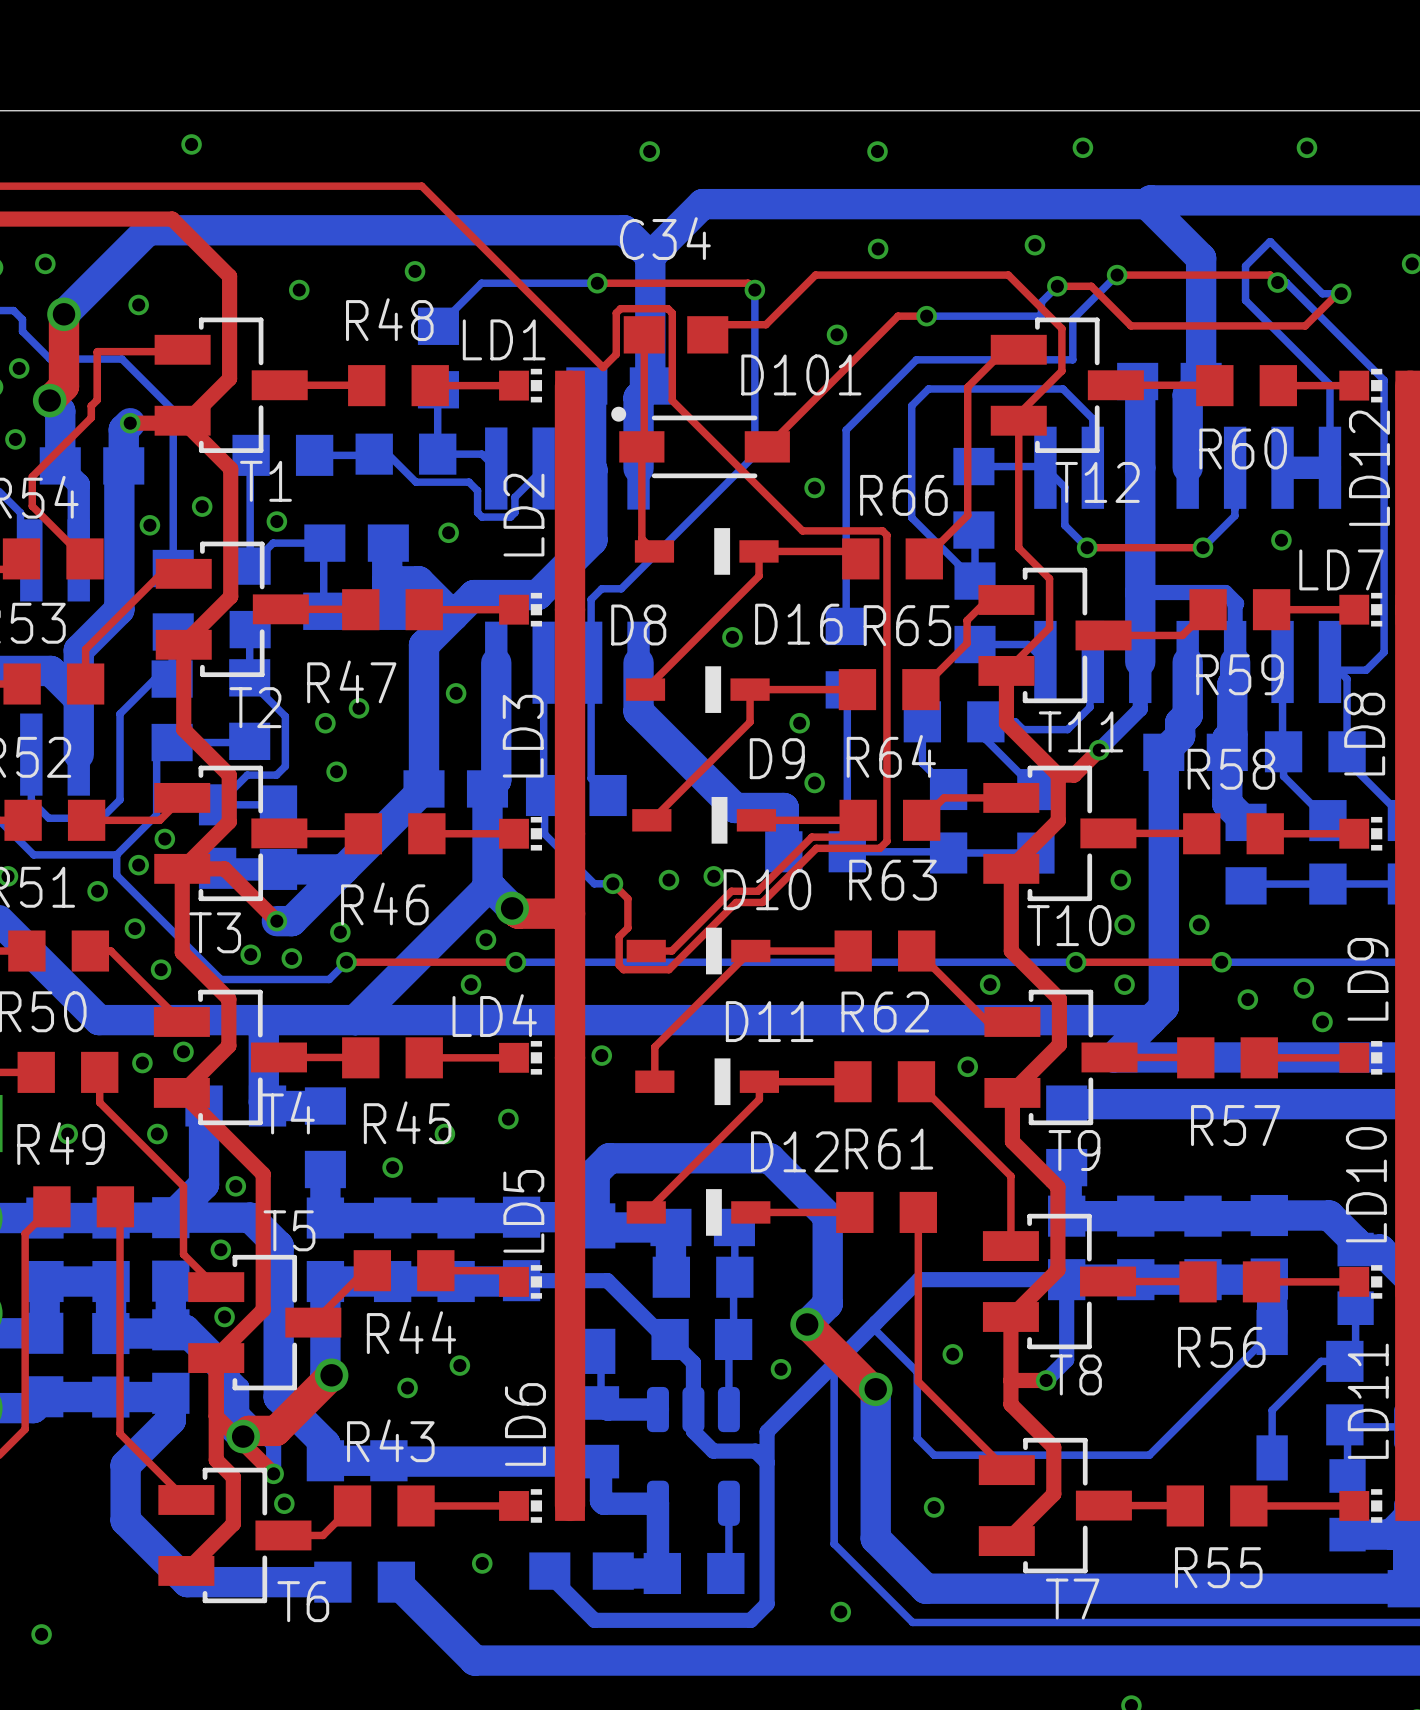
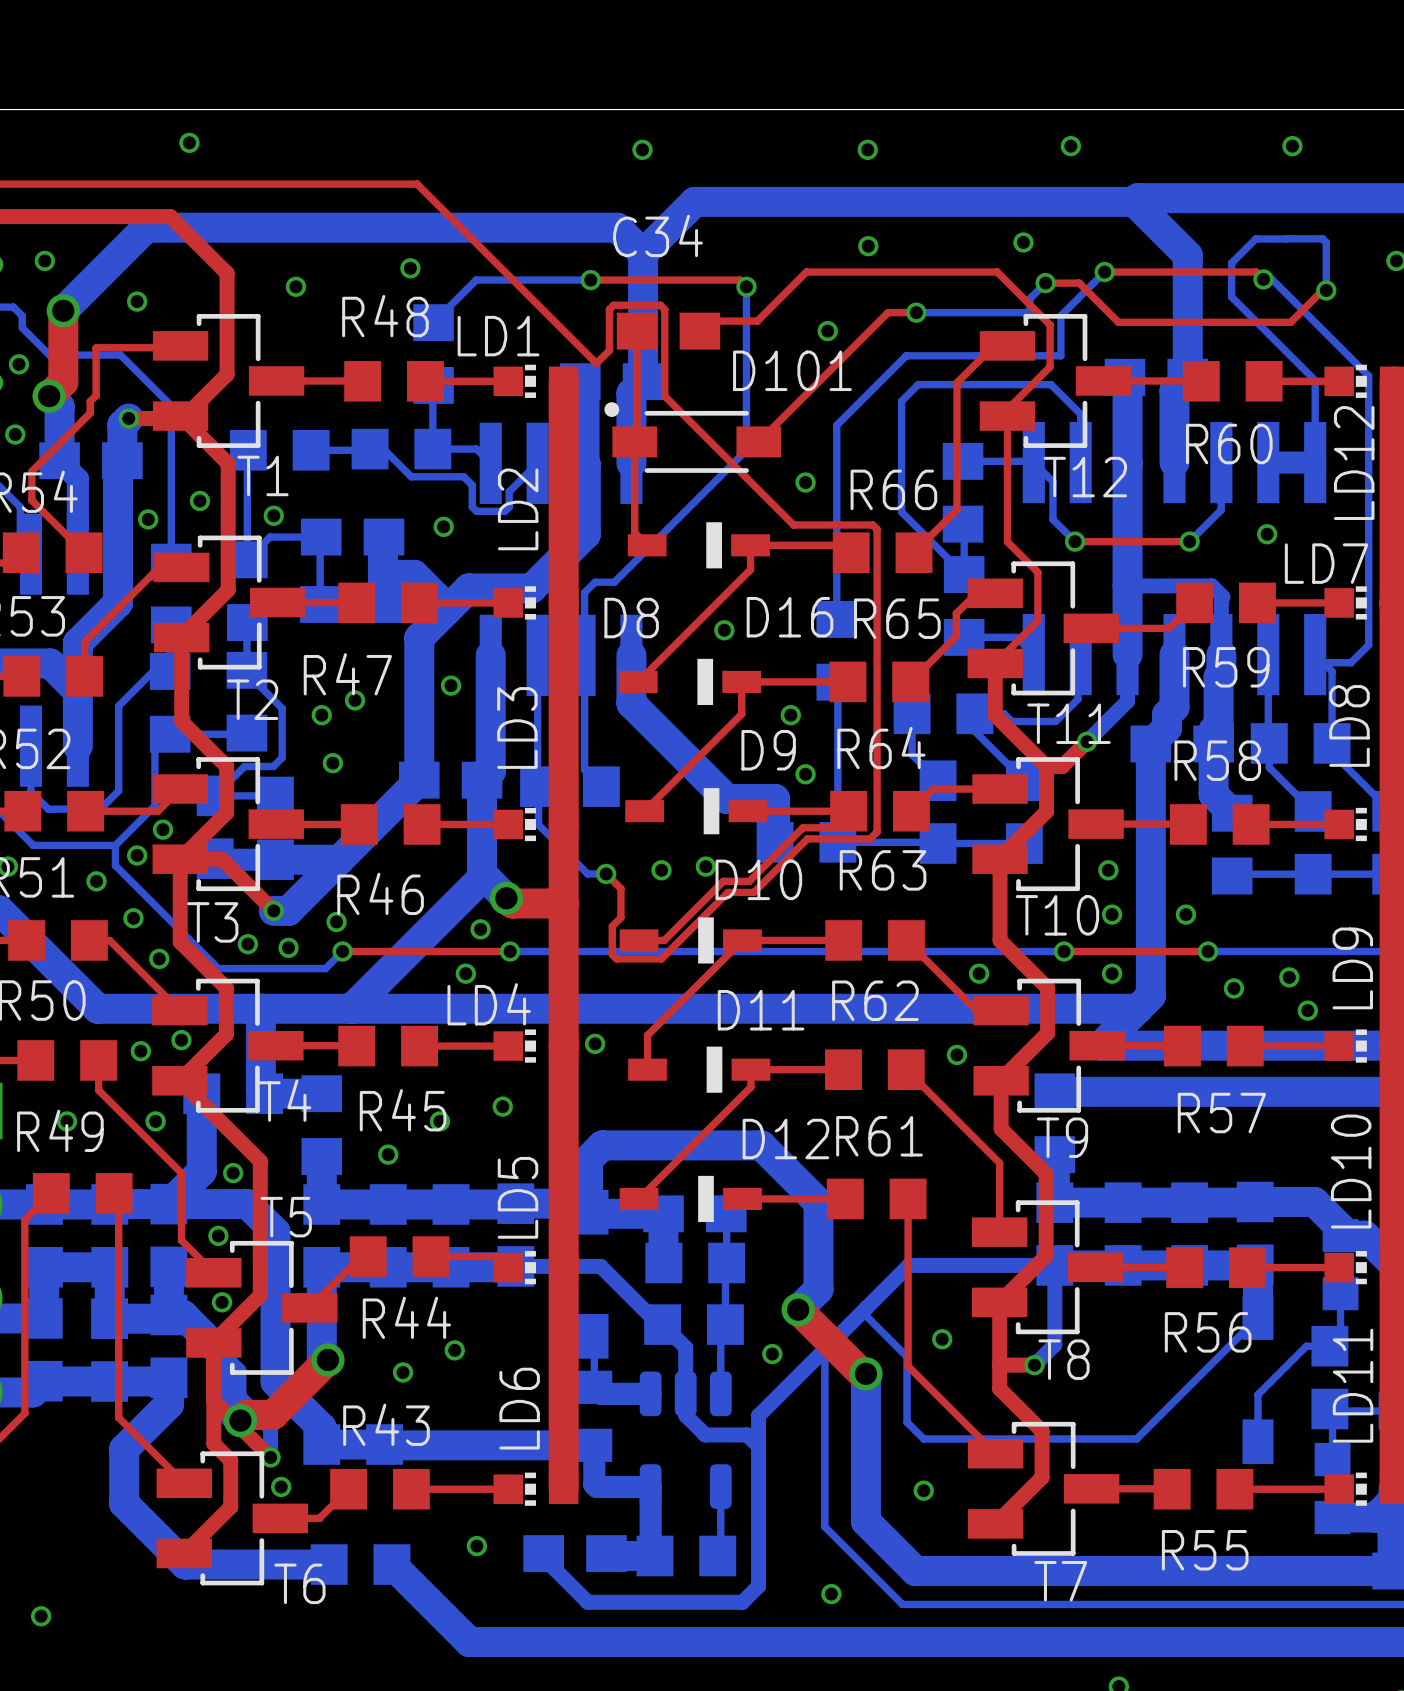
bottom track: (1270, 241) (1322, 293) (1341, 293) -> (1285, 238) (1322, 238) (1326, 242) (1326, 290)
bottom track: none -> (1256, 239) (1285, 239)

